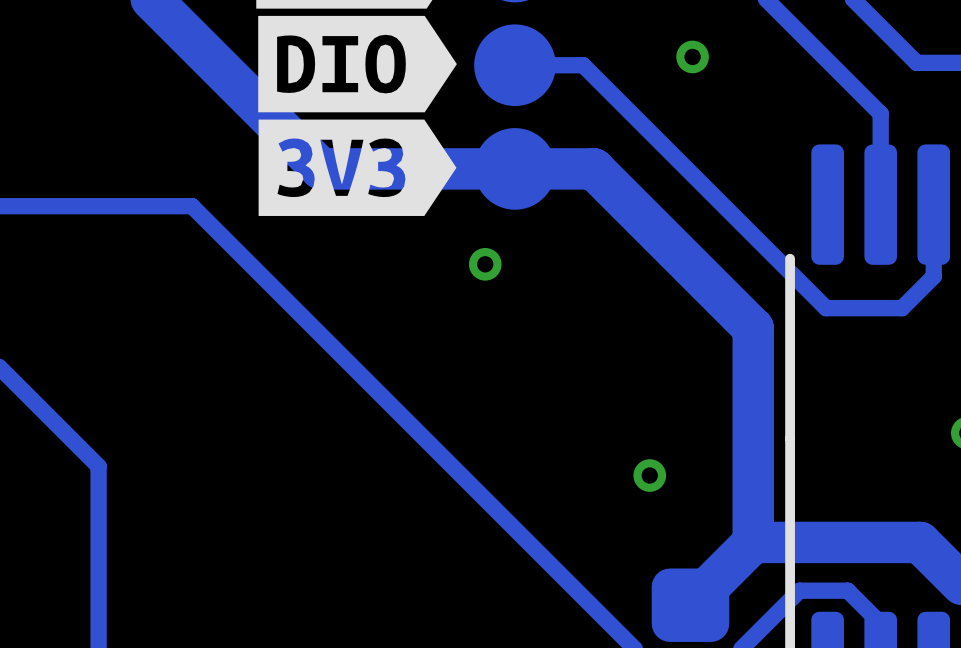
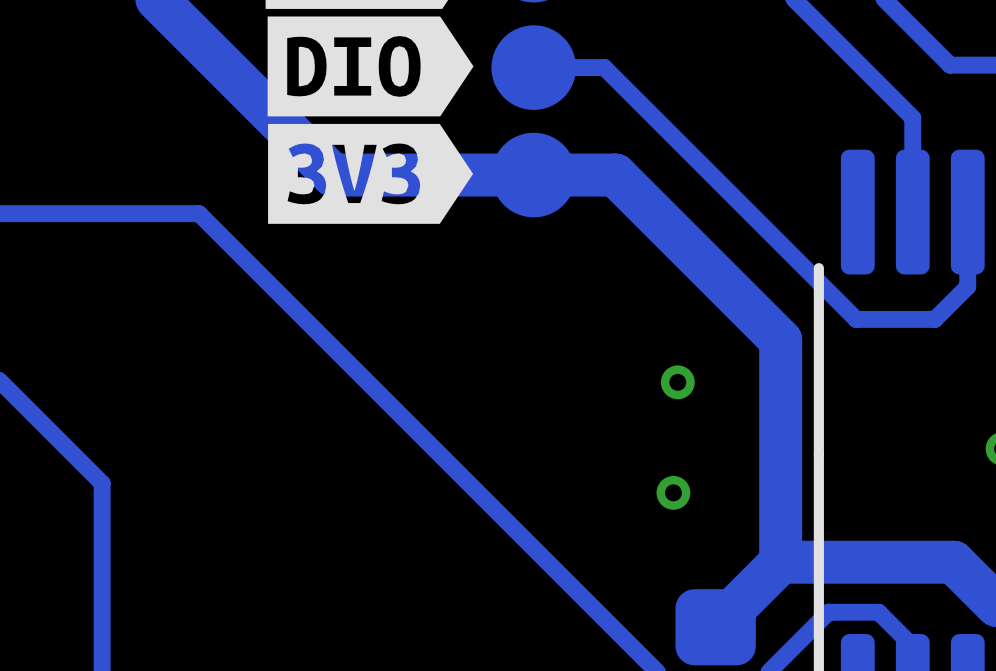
via: (692, 56) -> none
via: (485, 264) -> none
via: none -> (677, 382)

